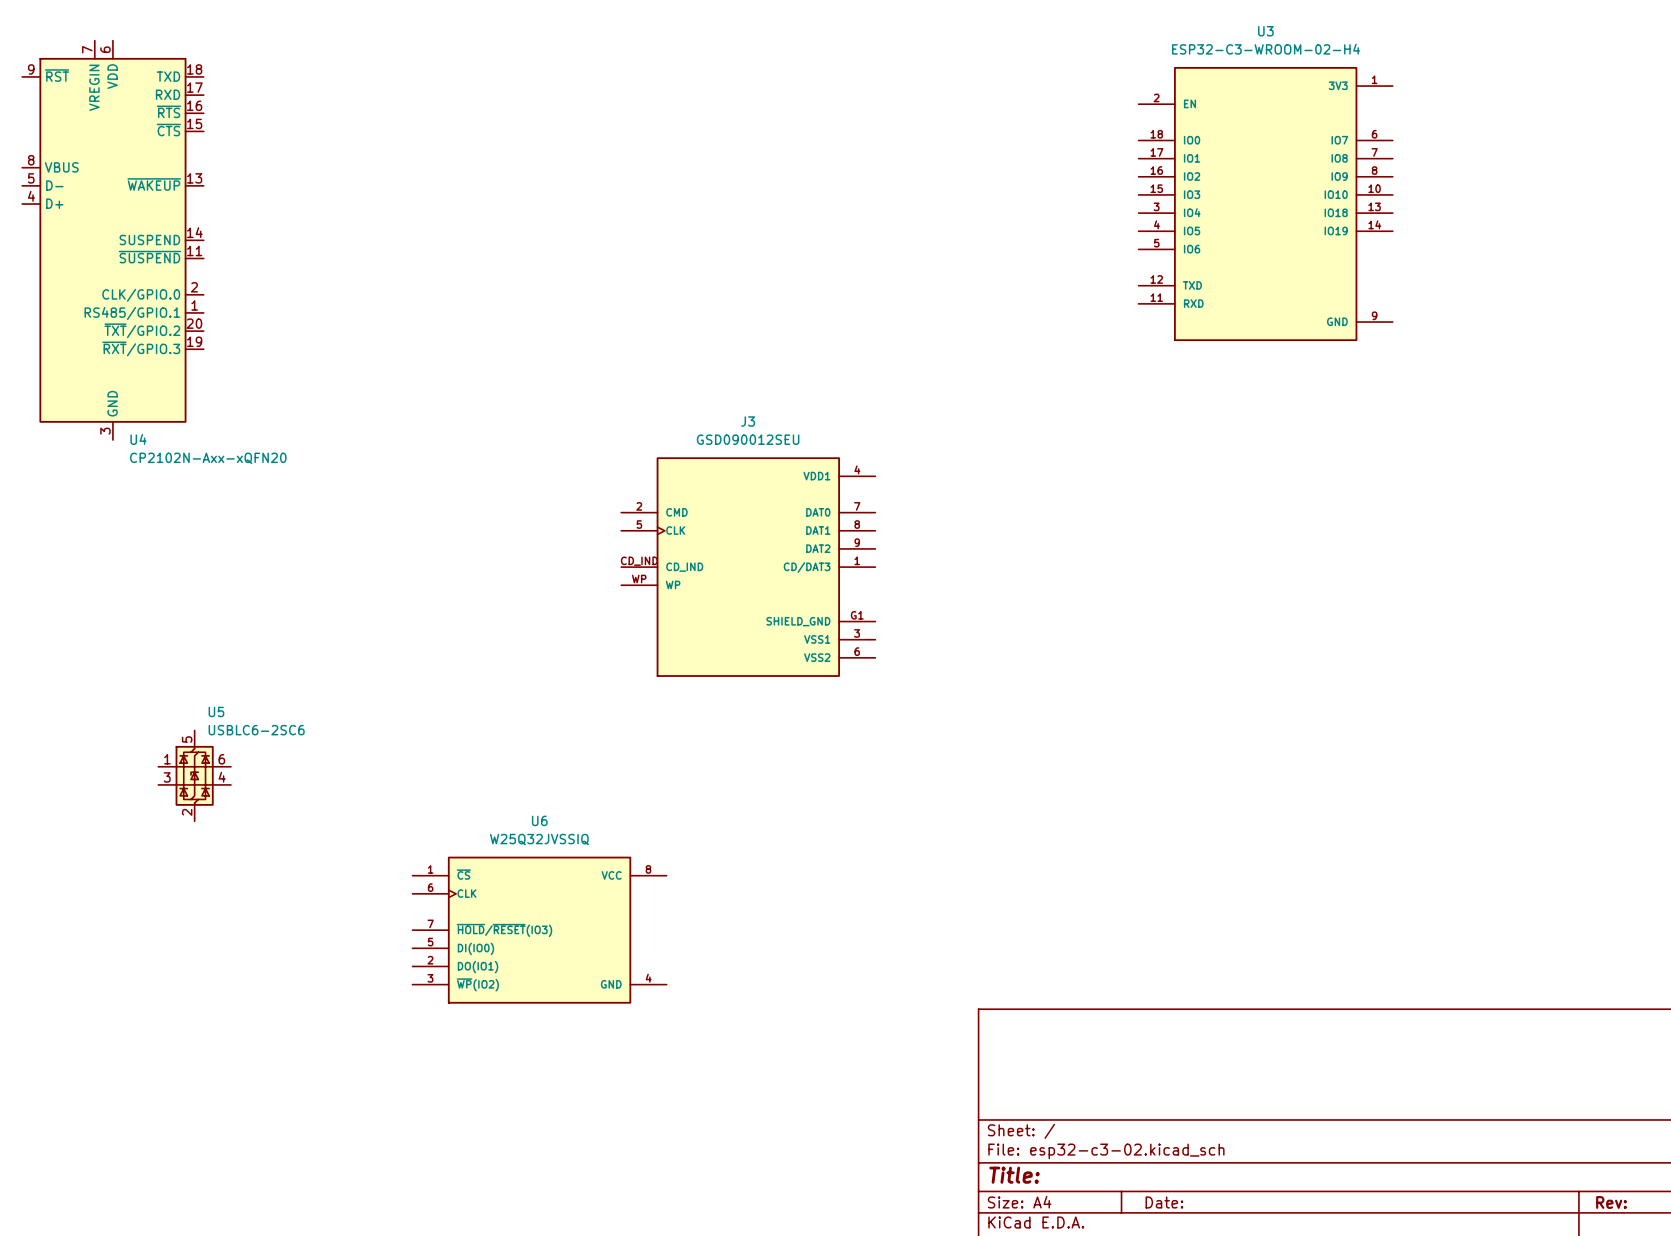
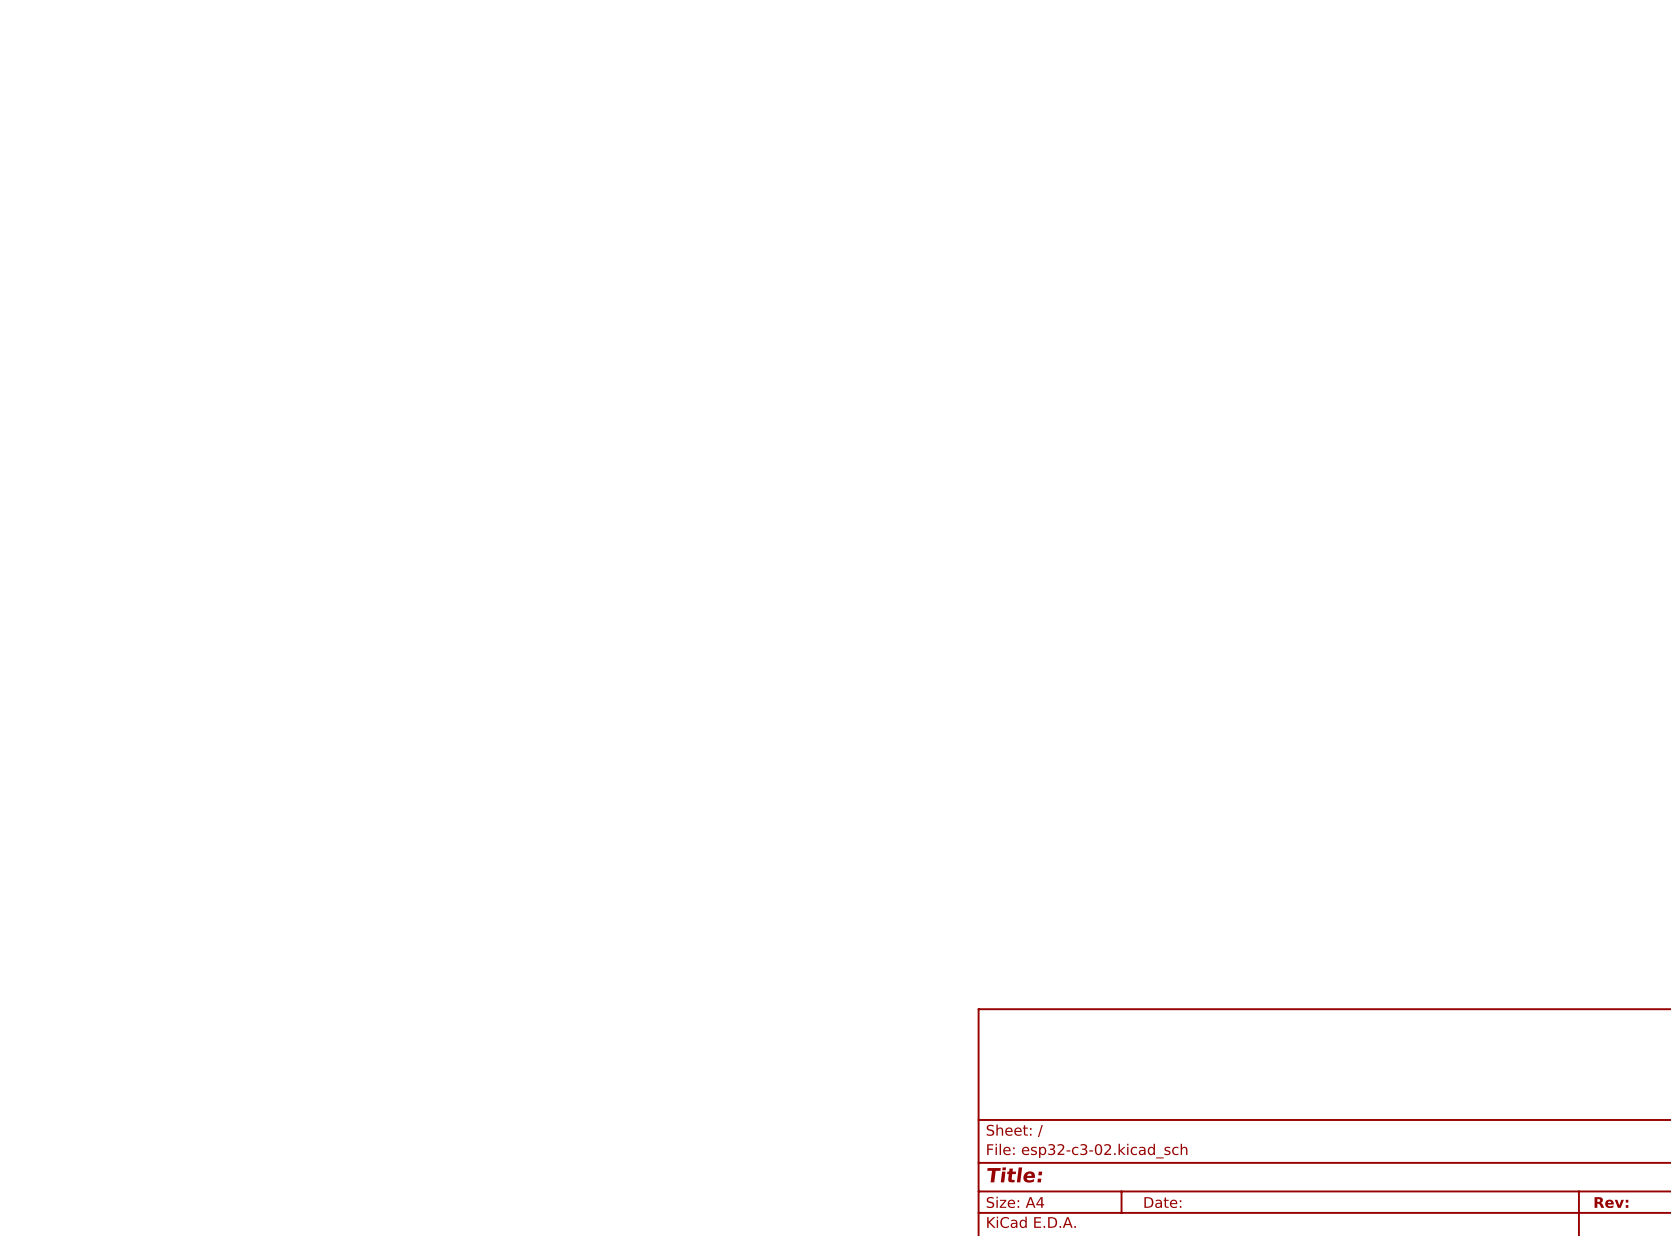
U3: ESP32-C3-WROOM-02-H4 (1265, 204) -> none
U4: CP2102N-Axx-xQFN20 (112, 240) -> none
J3: GSD090012SEU (748, 567) -> none
U5: USBLC6-2SC6 (194, 775) -> none
U6: W25Q32JVSSIQ (539, 930) -> none

